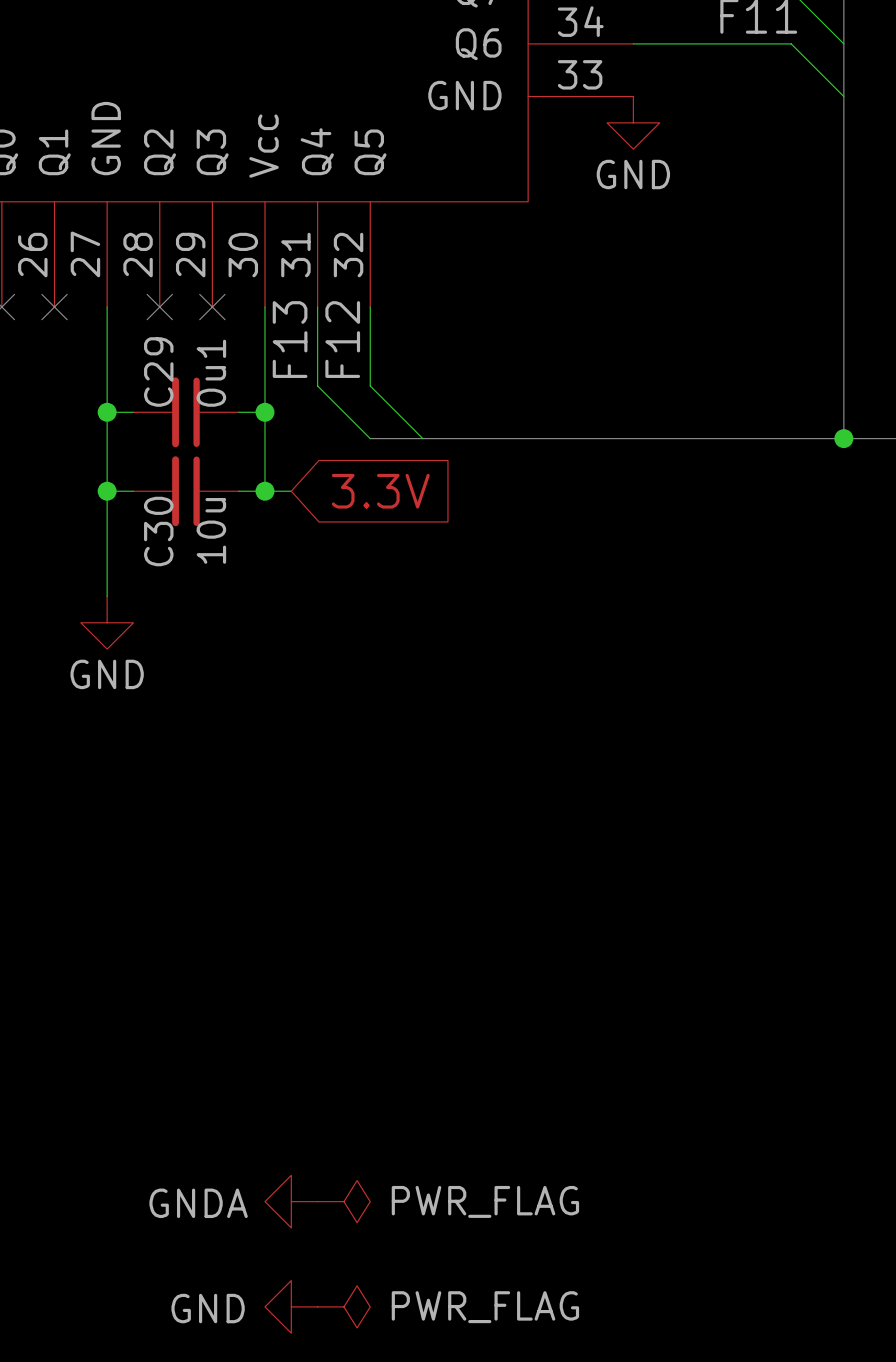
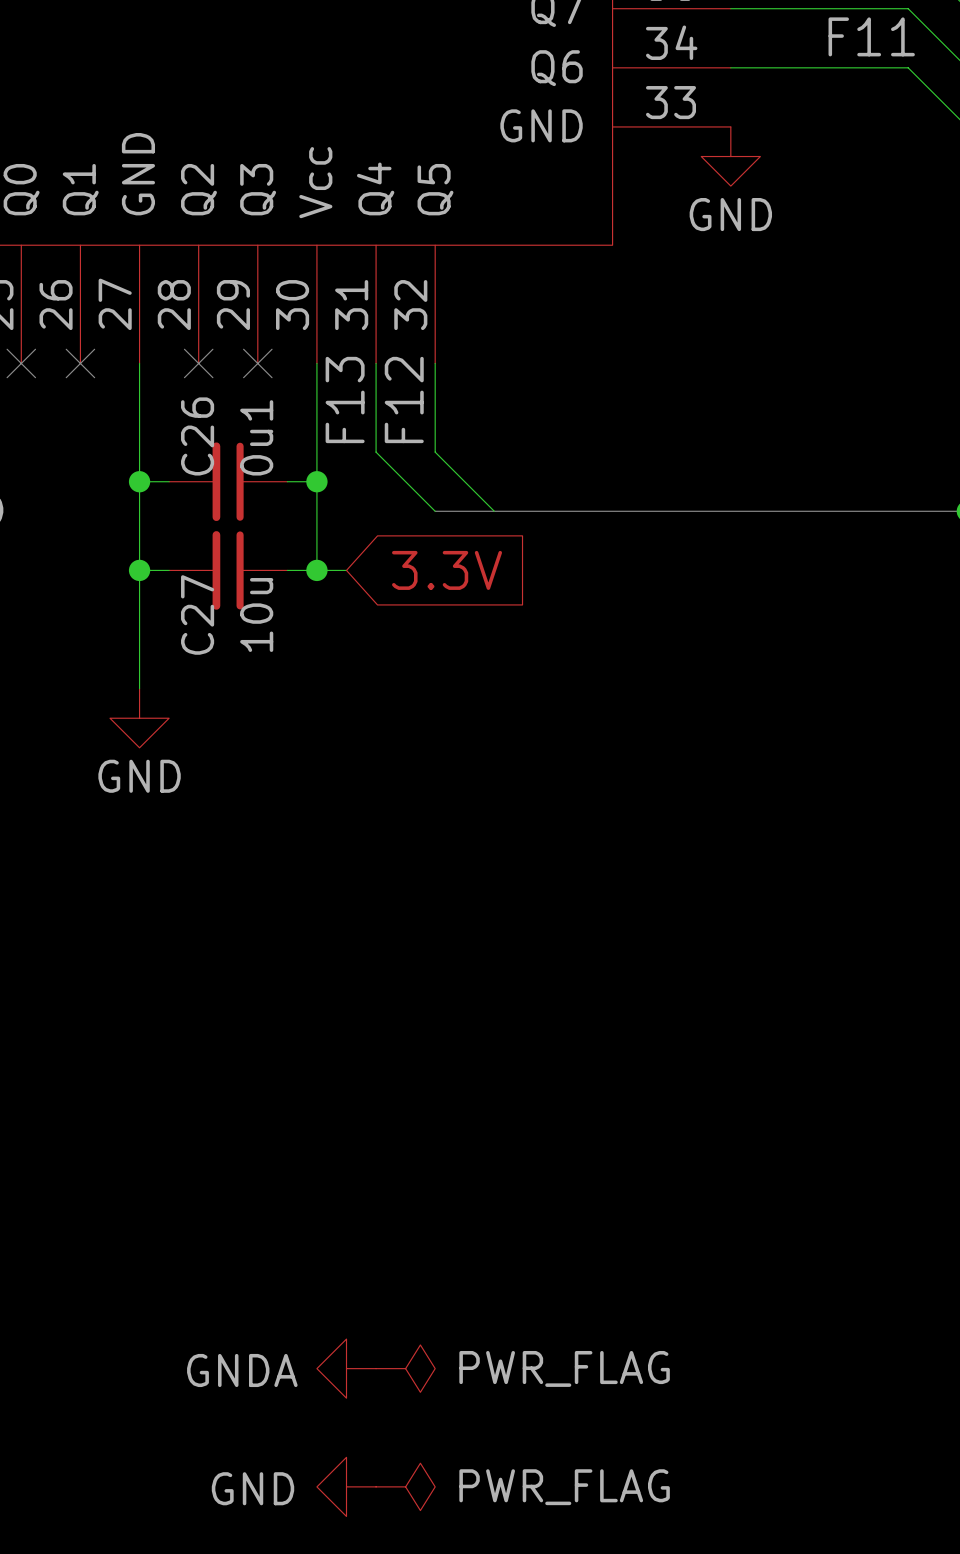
C29 name: C29 (158, 372) -> C26 (197, 436)
C30 name: C30 (158, 531) -> C27 (197, 614)

